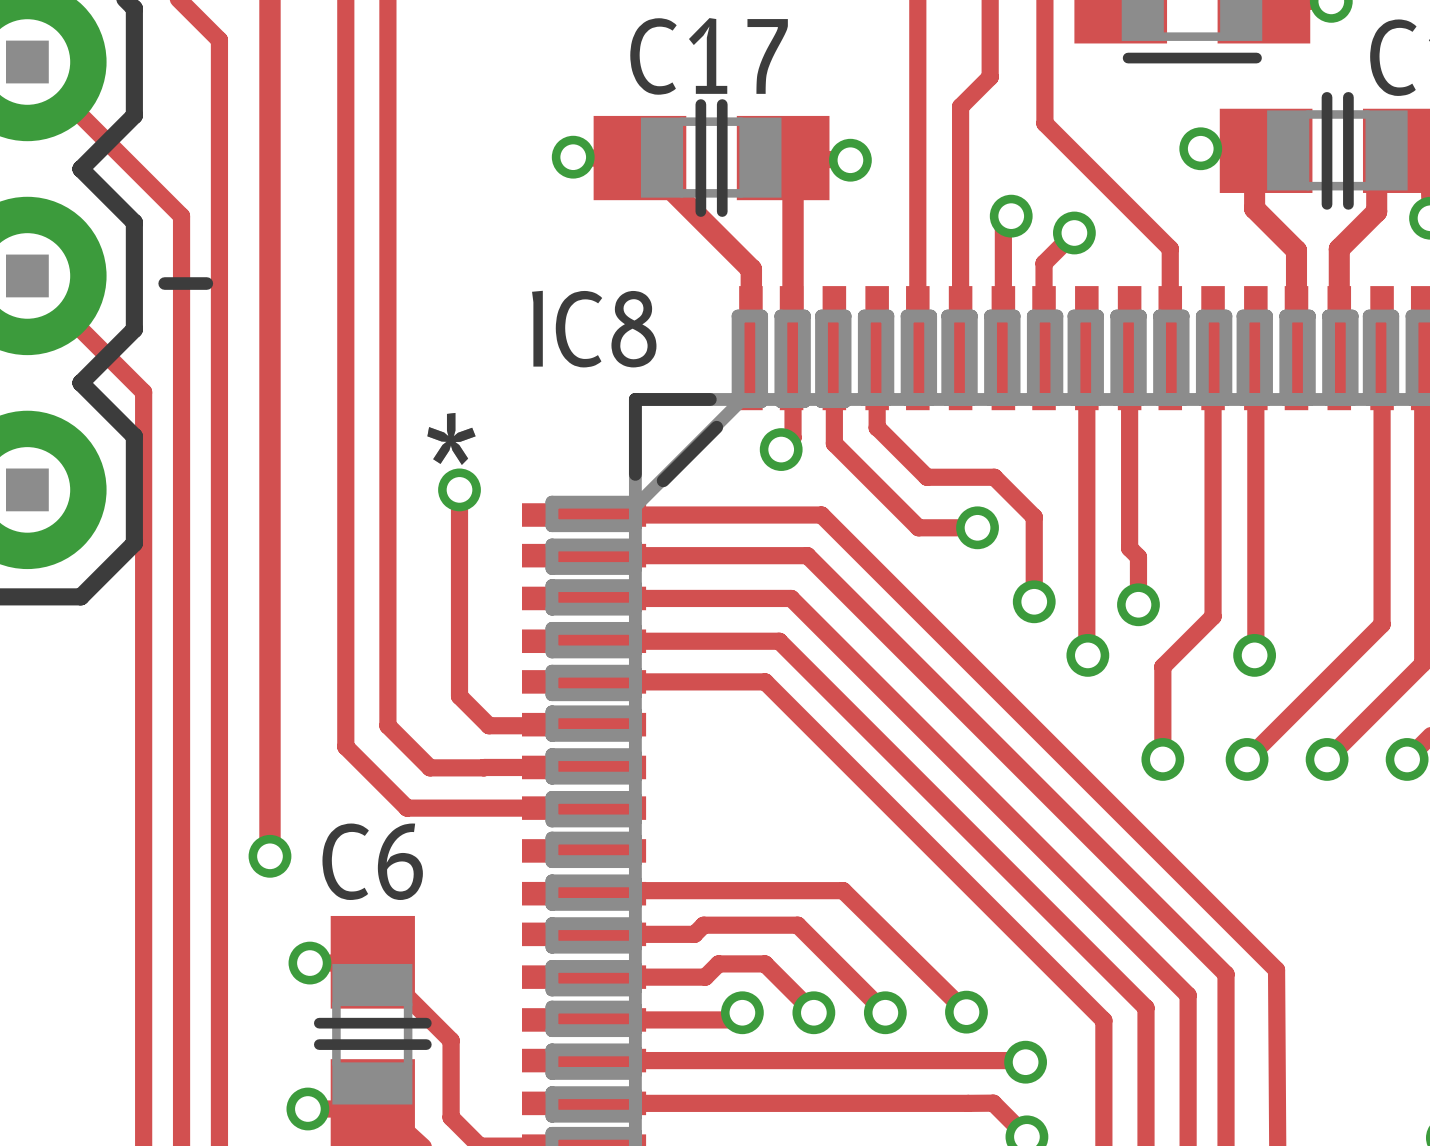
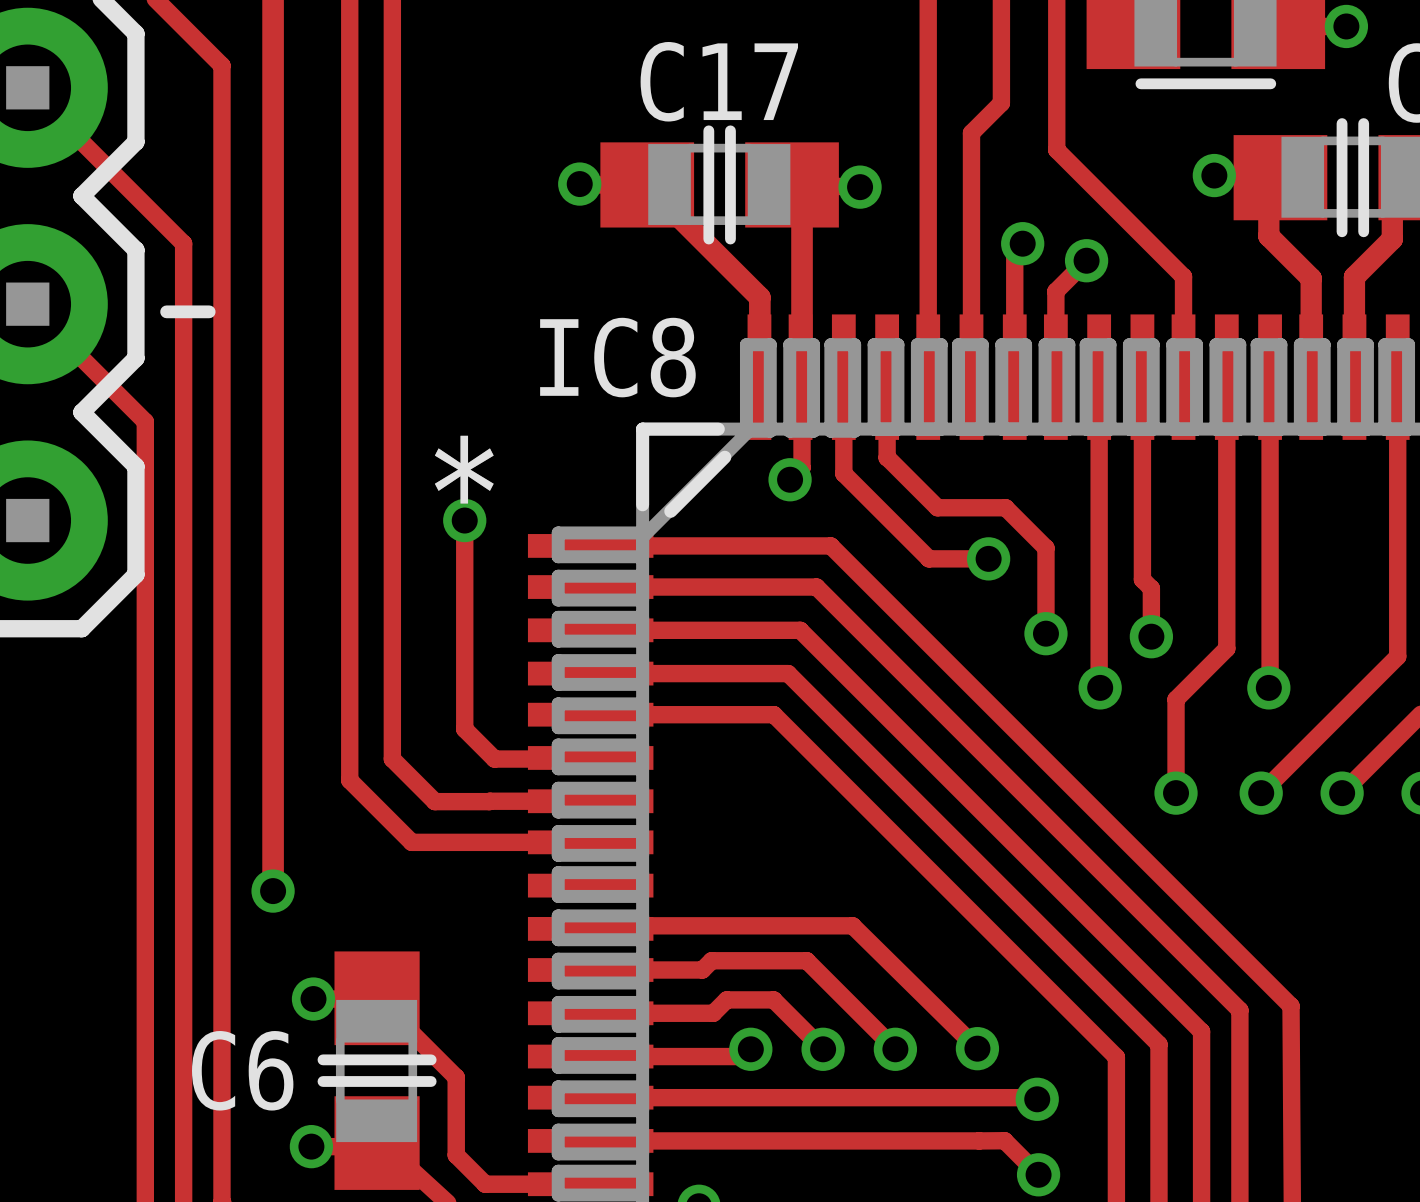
C6 name position: C6 (372, 861) -> C6 (242, 1070)

